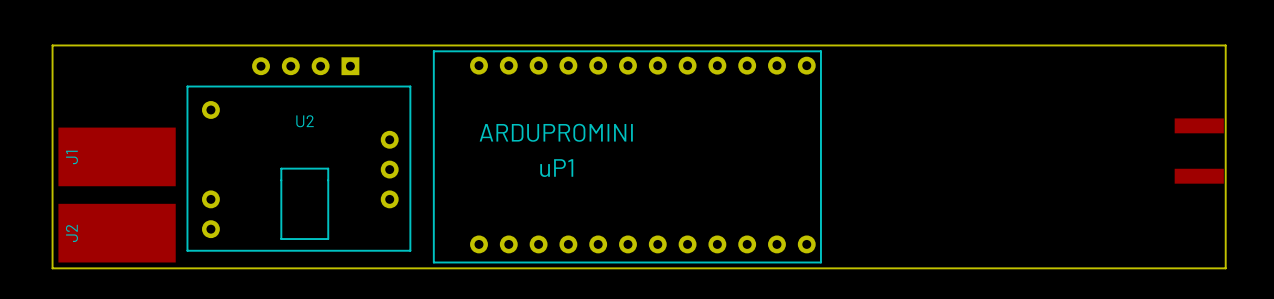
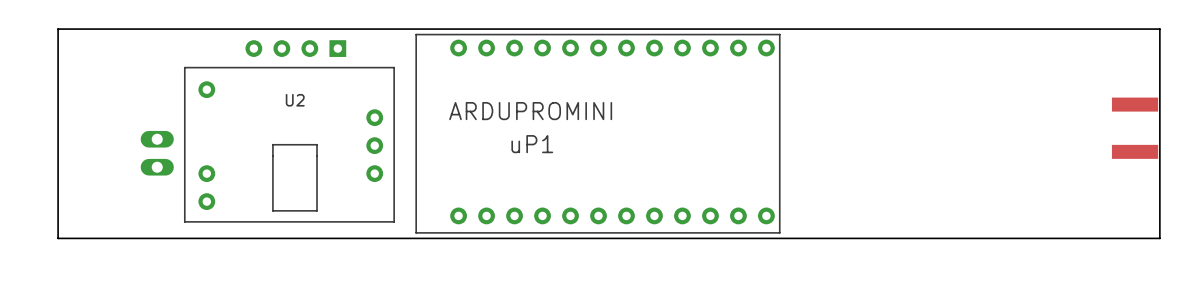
J1: (117, 156) -> none
part: none -> (157, 153)
J2: (117, 233) -> none

